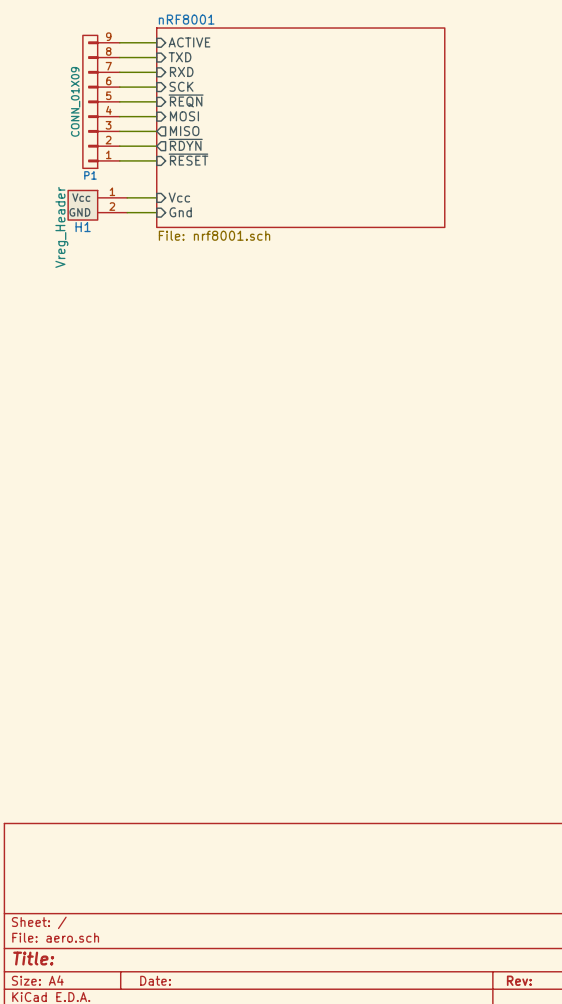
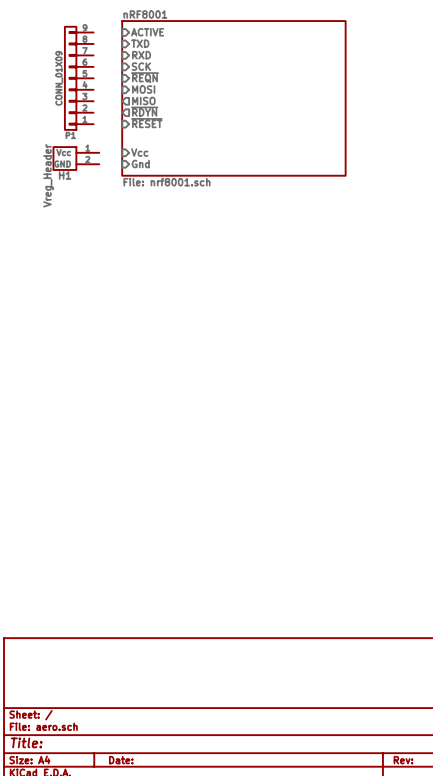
wire: (119, 42) (156, 42) -> none
wire: (119, 57) (156, 57) -> none
wire: (119, 72) (156, 72) -> none
wire: (119, 87) (156, 87) -> none
wire: (119, 101) (156, 101) -> none
wire: (119, 116) (156, 116) -> none
wire: (119, 131) (156, 131) -> none
wire: (119, 146) (156, 146) -> none
wire: (119, 160) (156, 160) -> none
wire: (127, 197) (156, 197) -> none
wire: (127, 212) (156, 212) -> none

